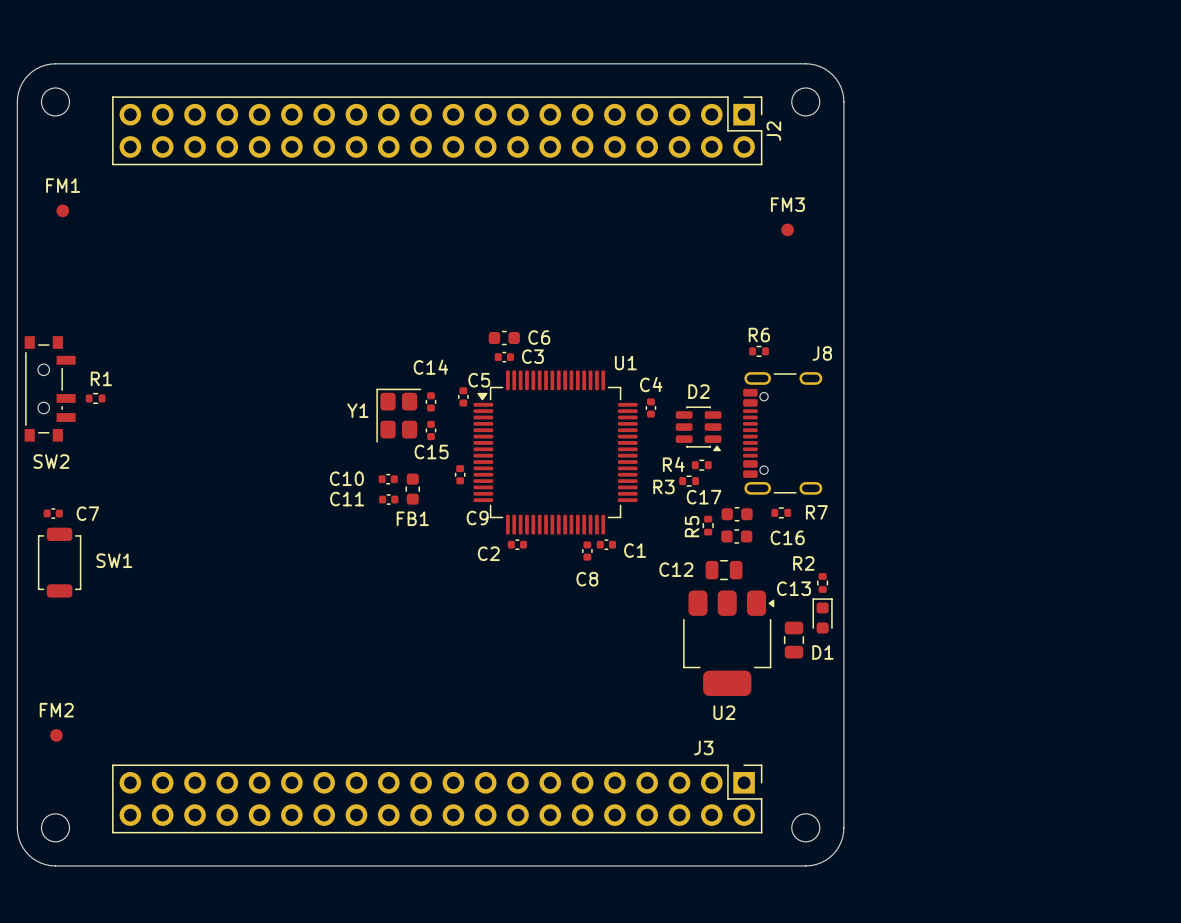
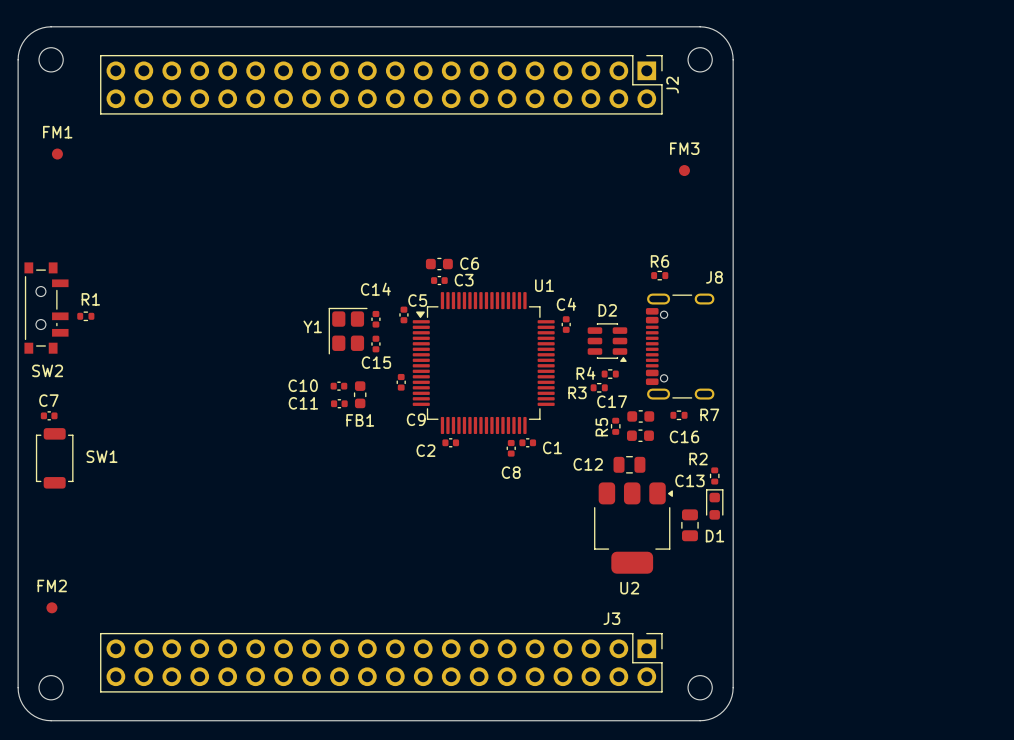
C7 name position: C7 (87, 513) -> C7 (48, 400)

